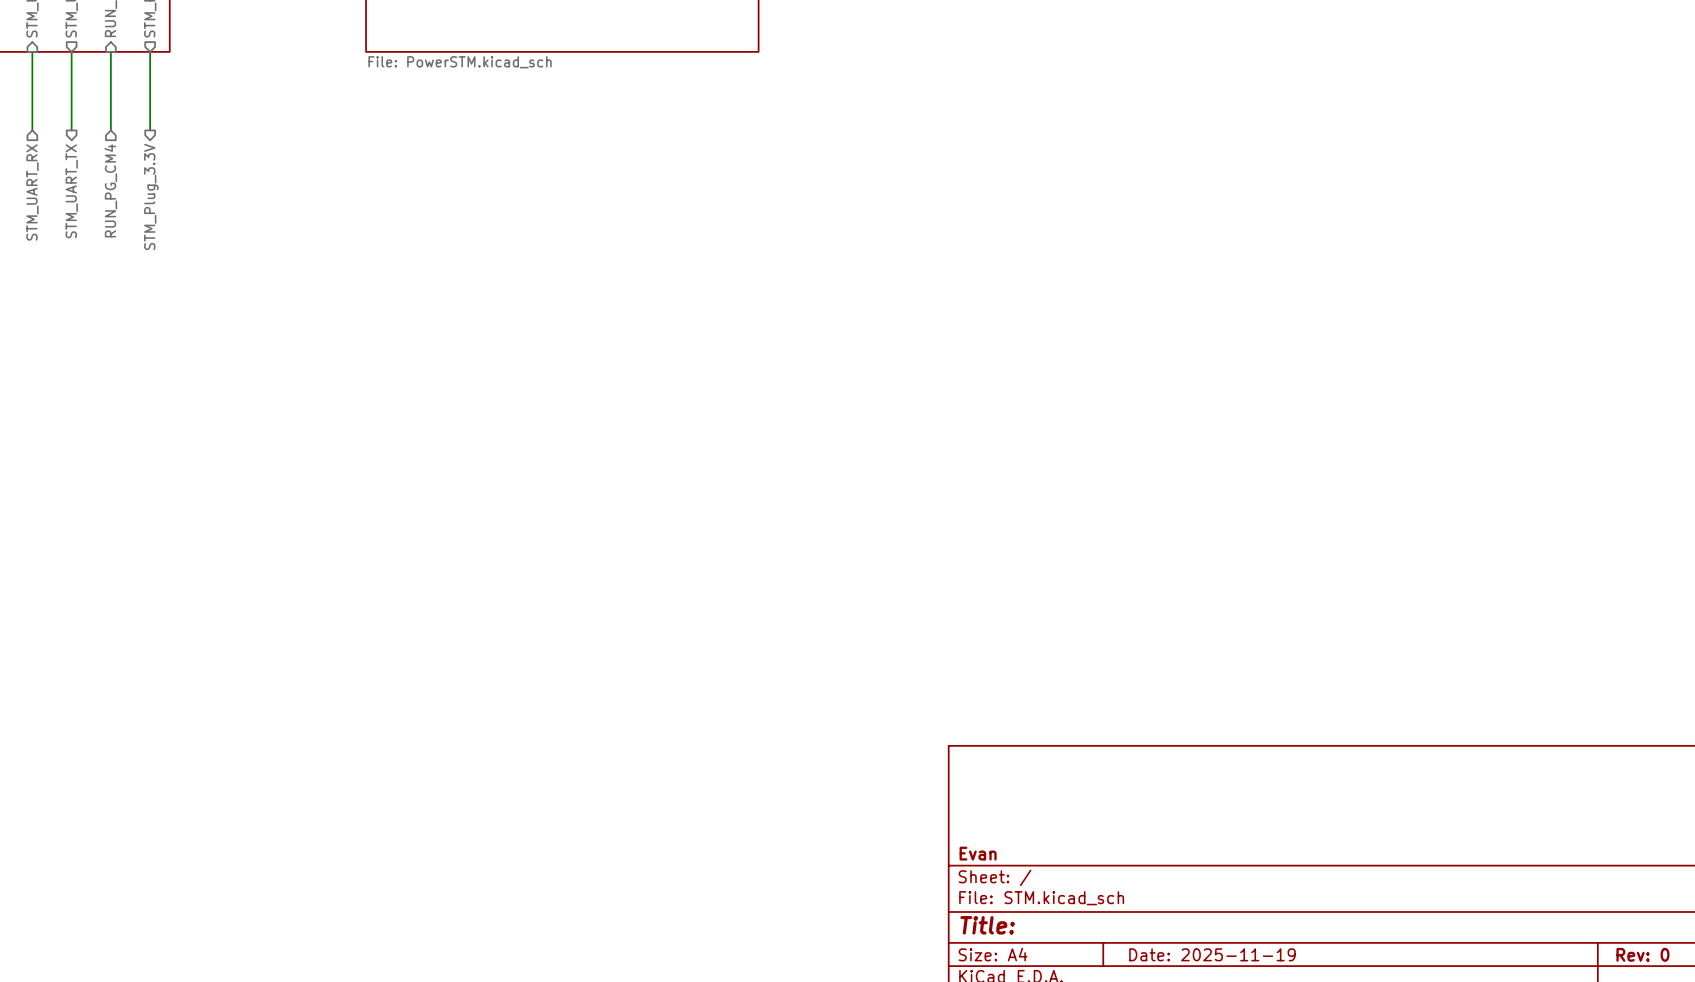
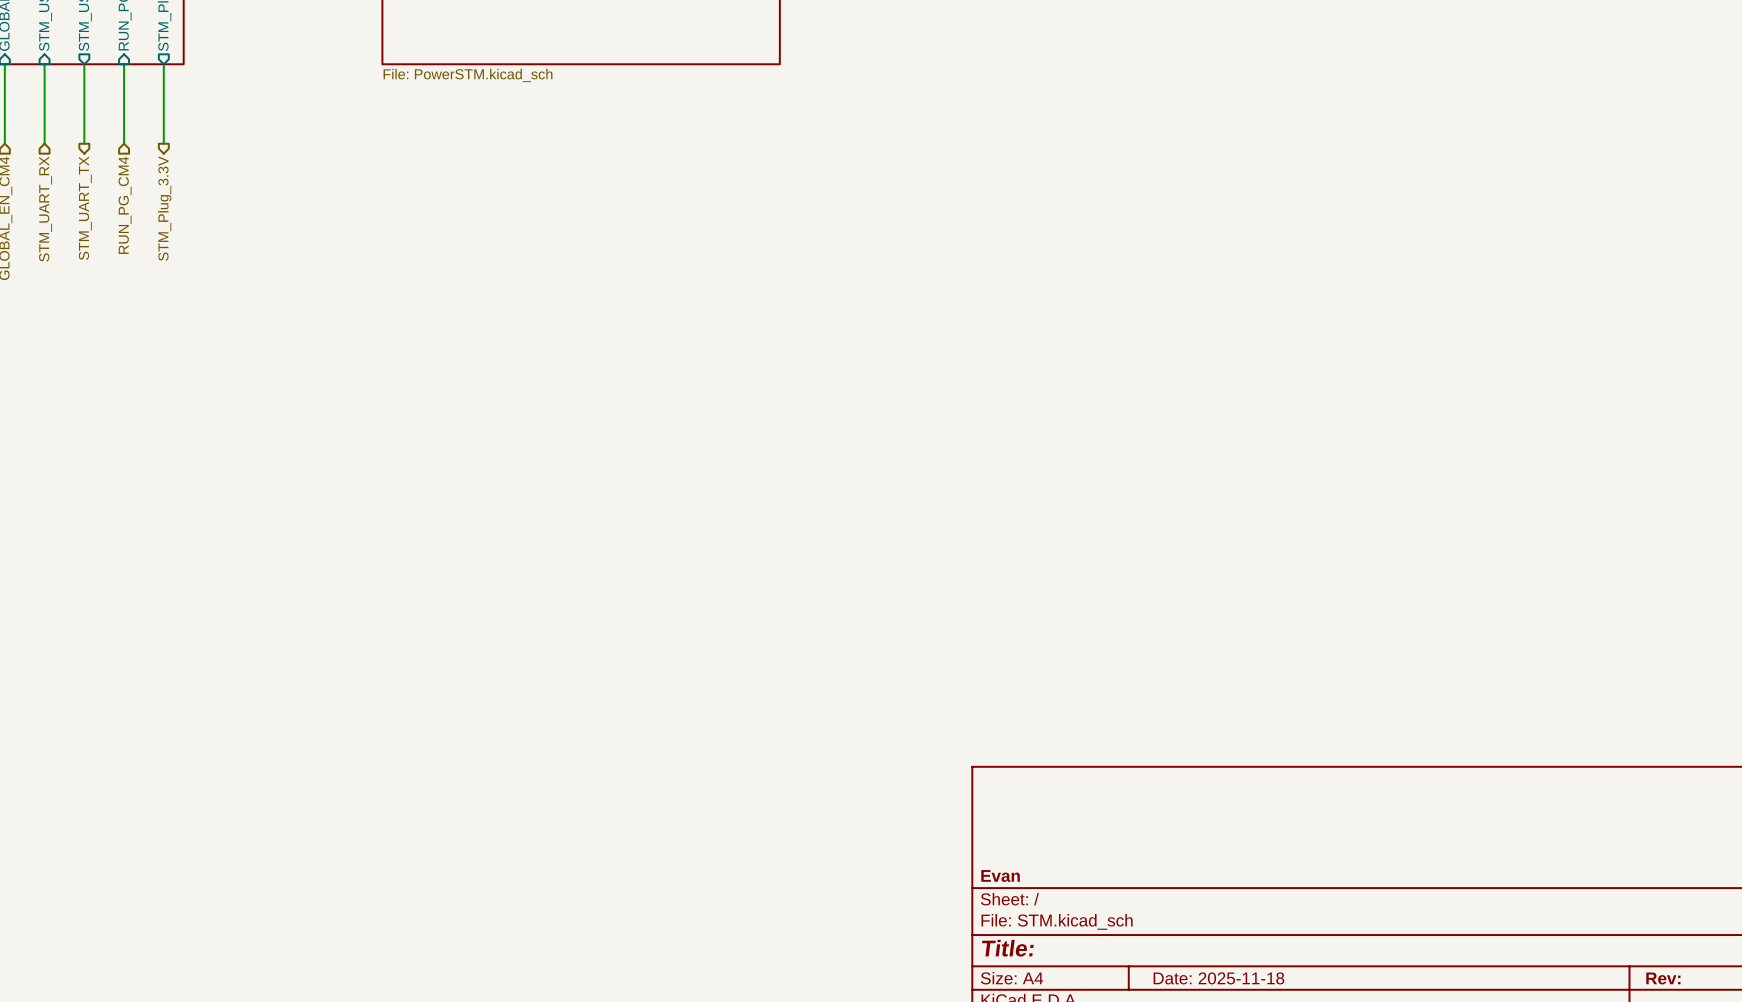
title block: Date: 2025-11-19 (1212, 954) -> Date: 2025-11-18 (1218, 978)
title block: Rev: 0 (1642, 954) -> Rev: (1663, 978)

